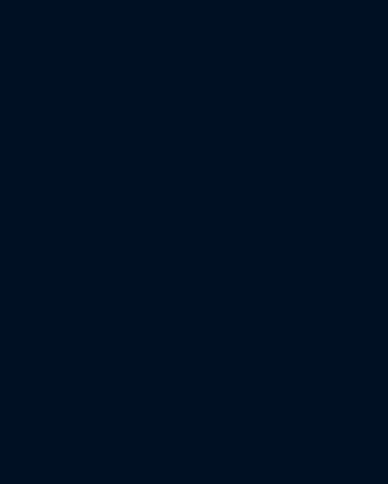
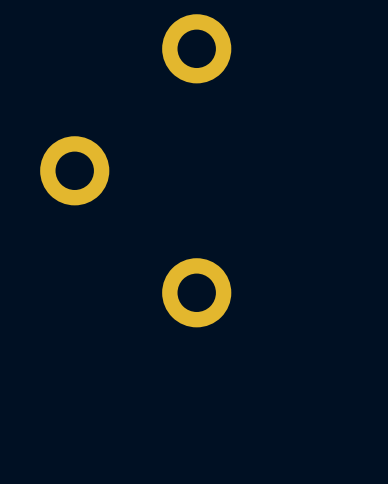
part: none -> (135, 170)

